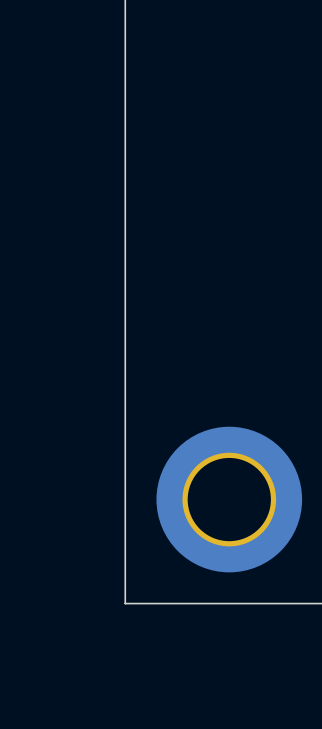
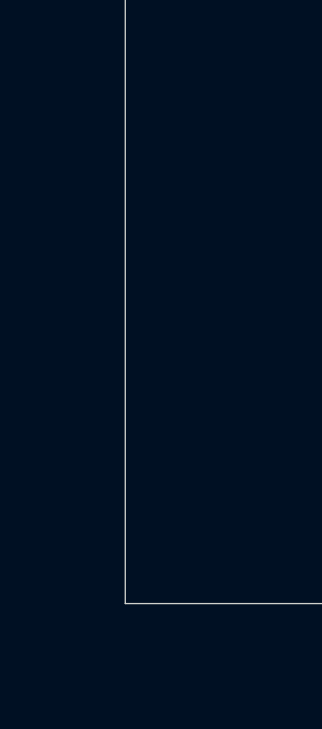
part: (229, 499) -> none

